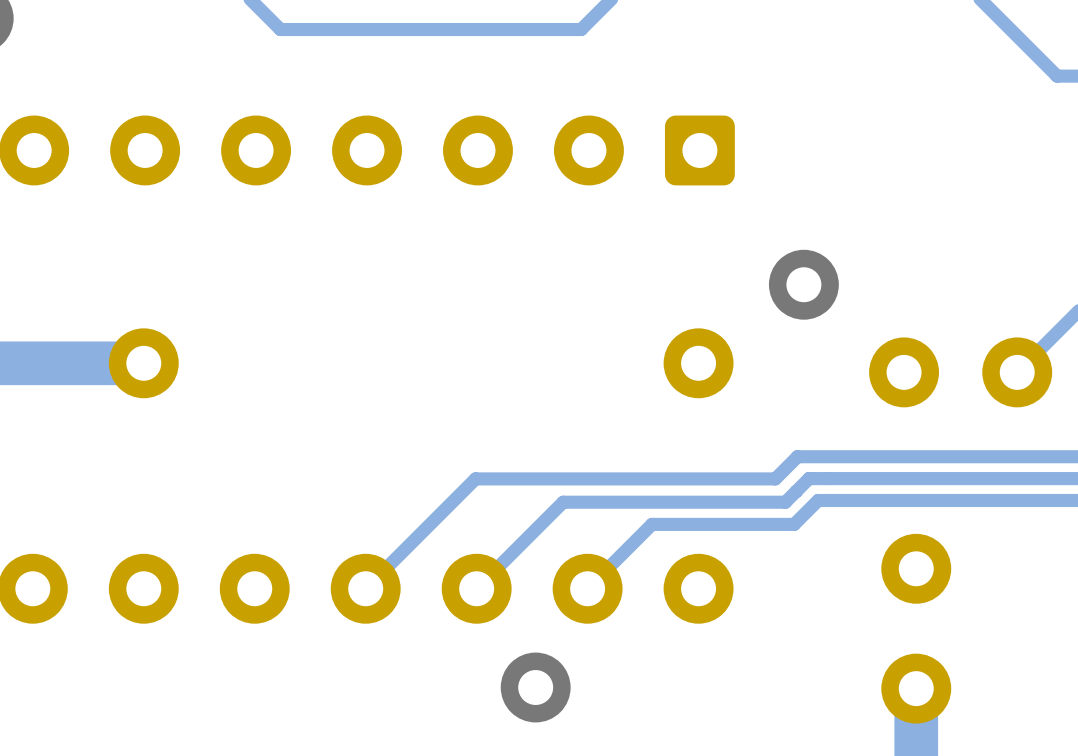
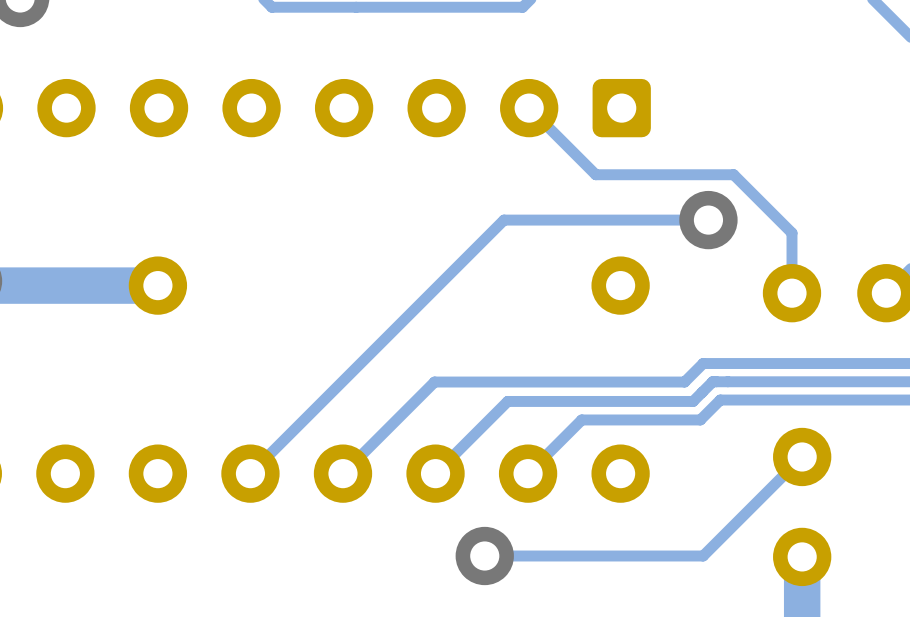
track: none -> (529, 108) (595, 174) (733, 174) (791, 233) (791, 293)
track: none -> (708, 220) (504, 220) (250, 473)
track: none -> (802, 456) (703, 556) (484, 556)

